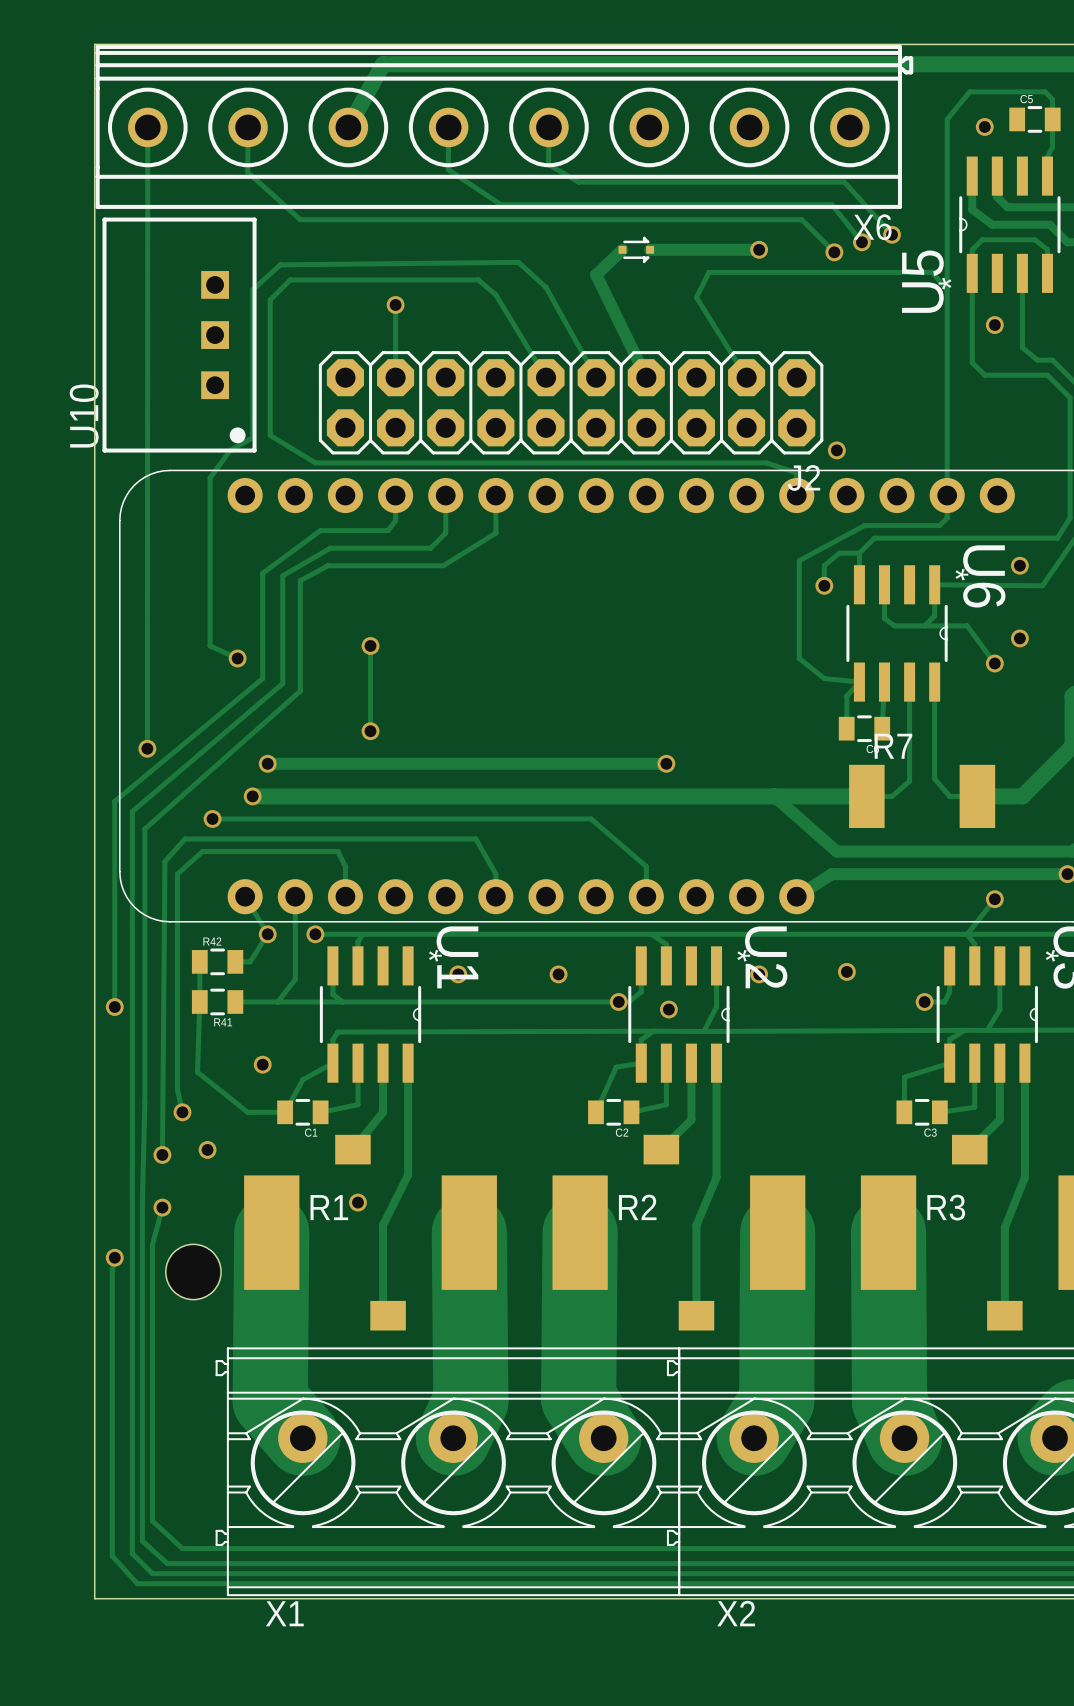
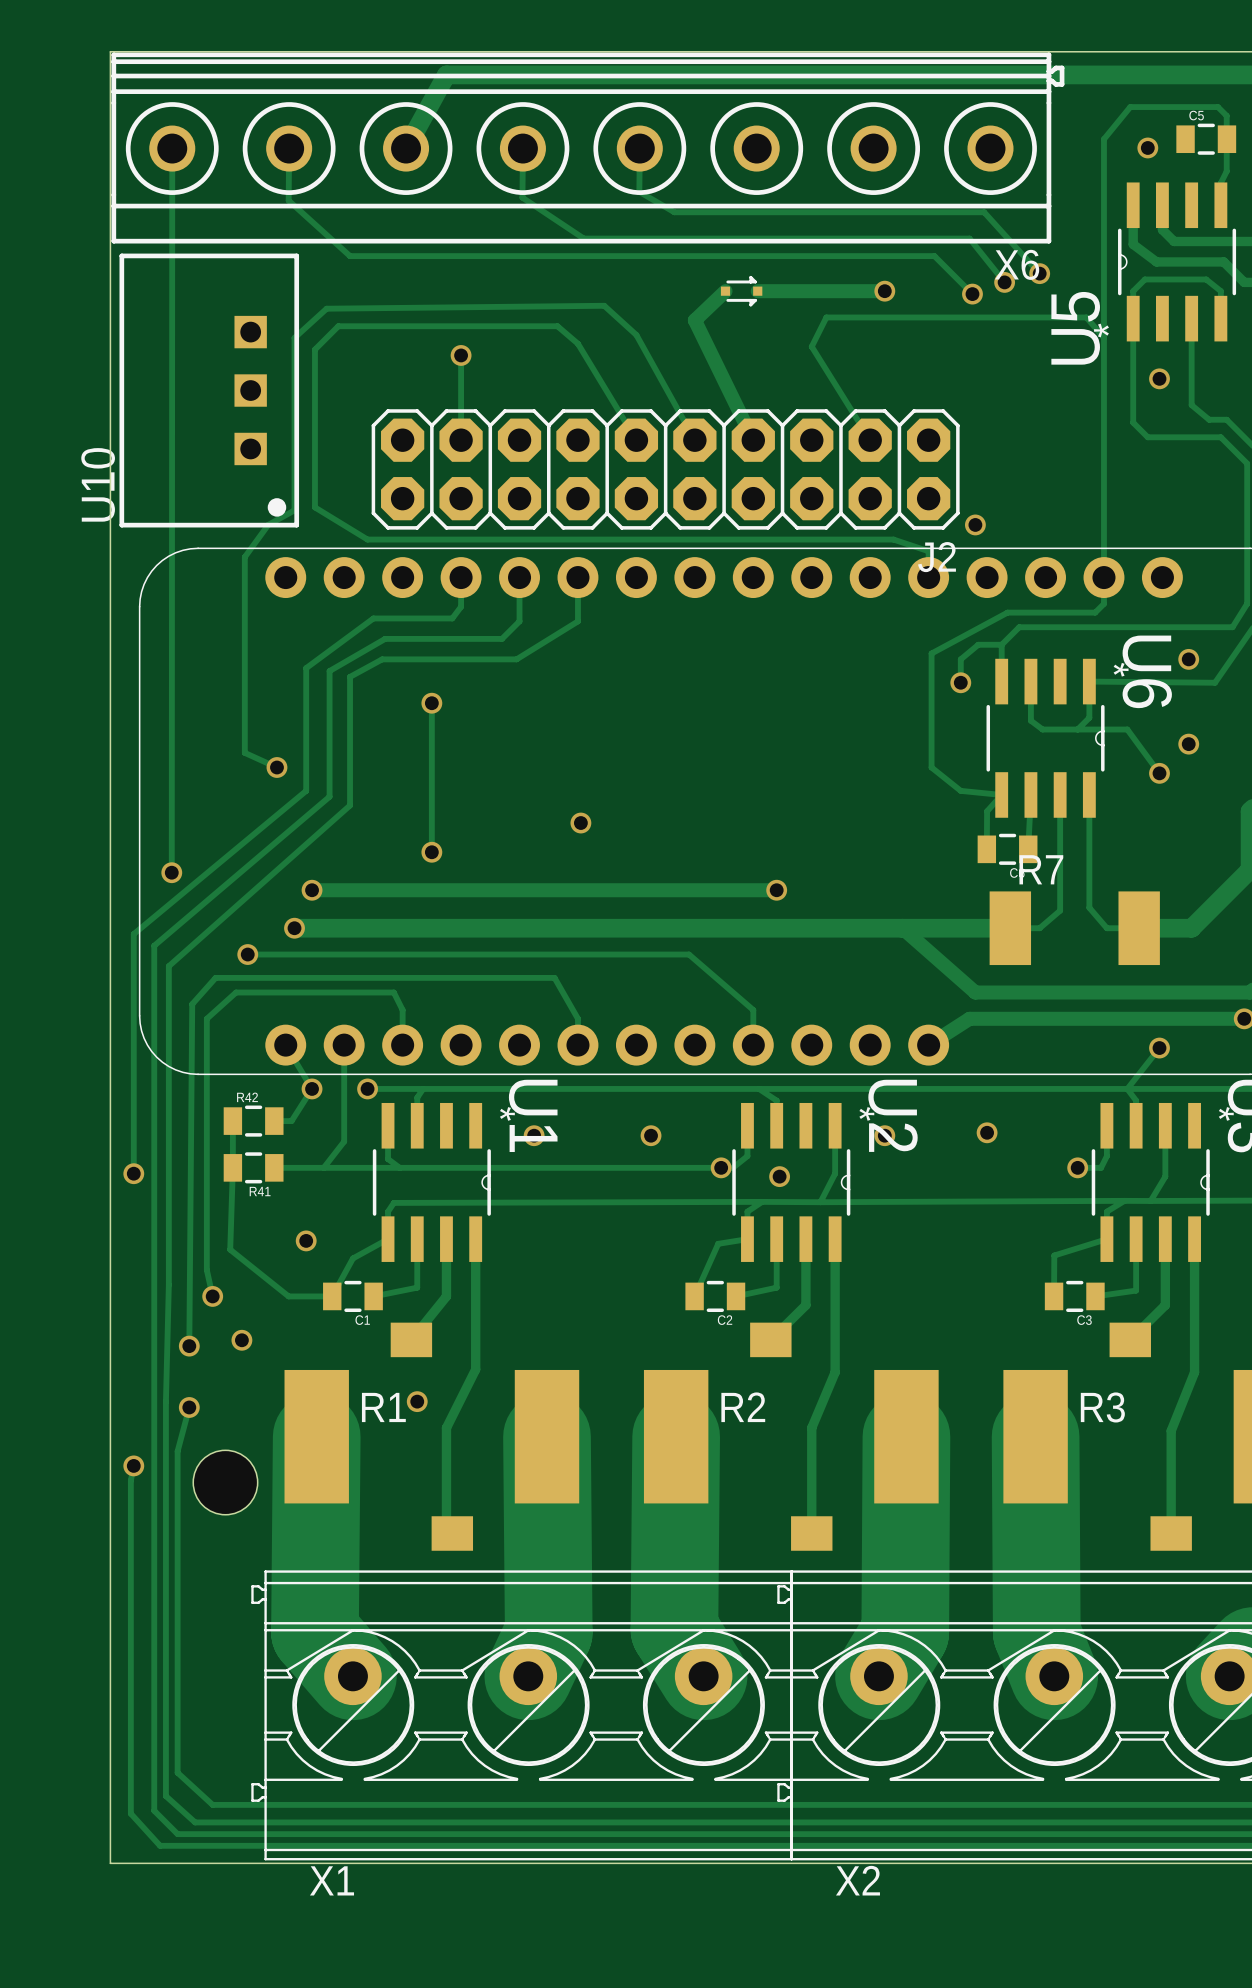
track: none -> (431, 703) (431, 752)
via position: (370, 645) -> (431, 703)
via: none -> (580, 823)

